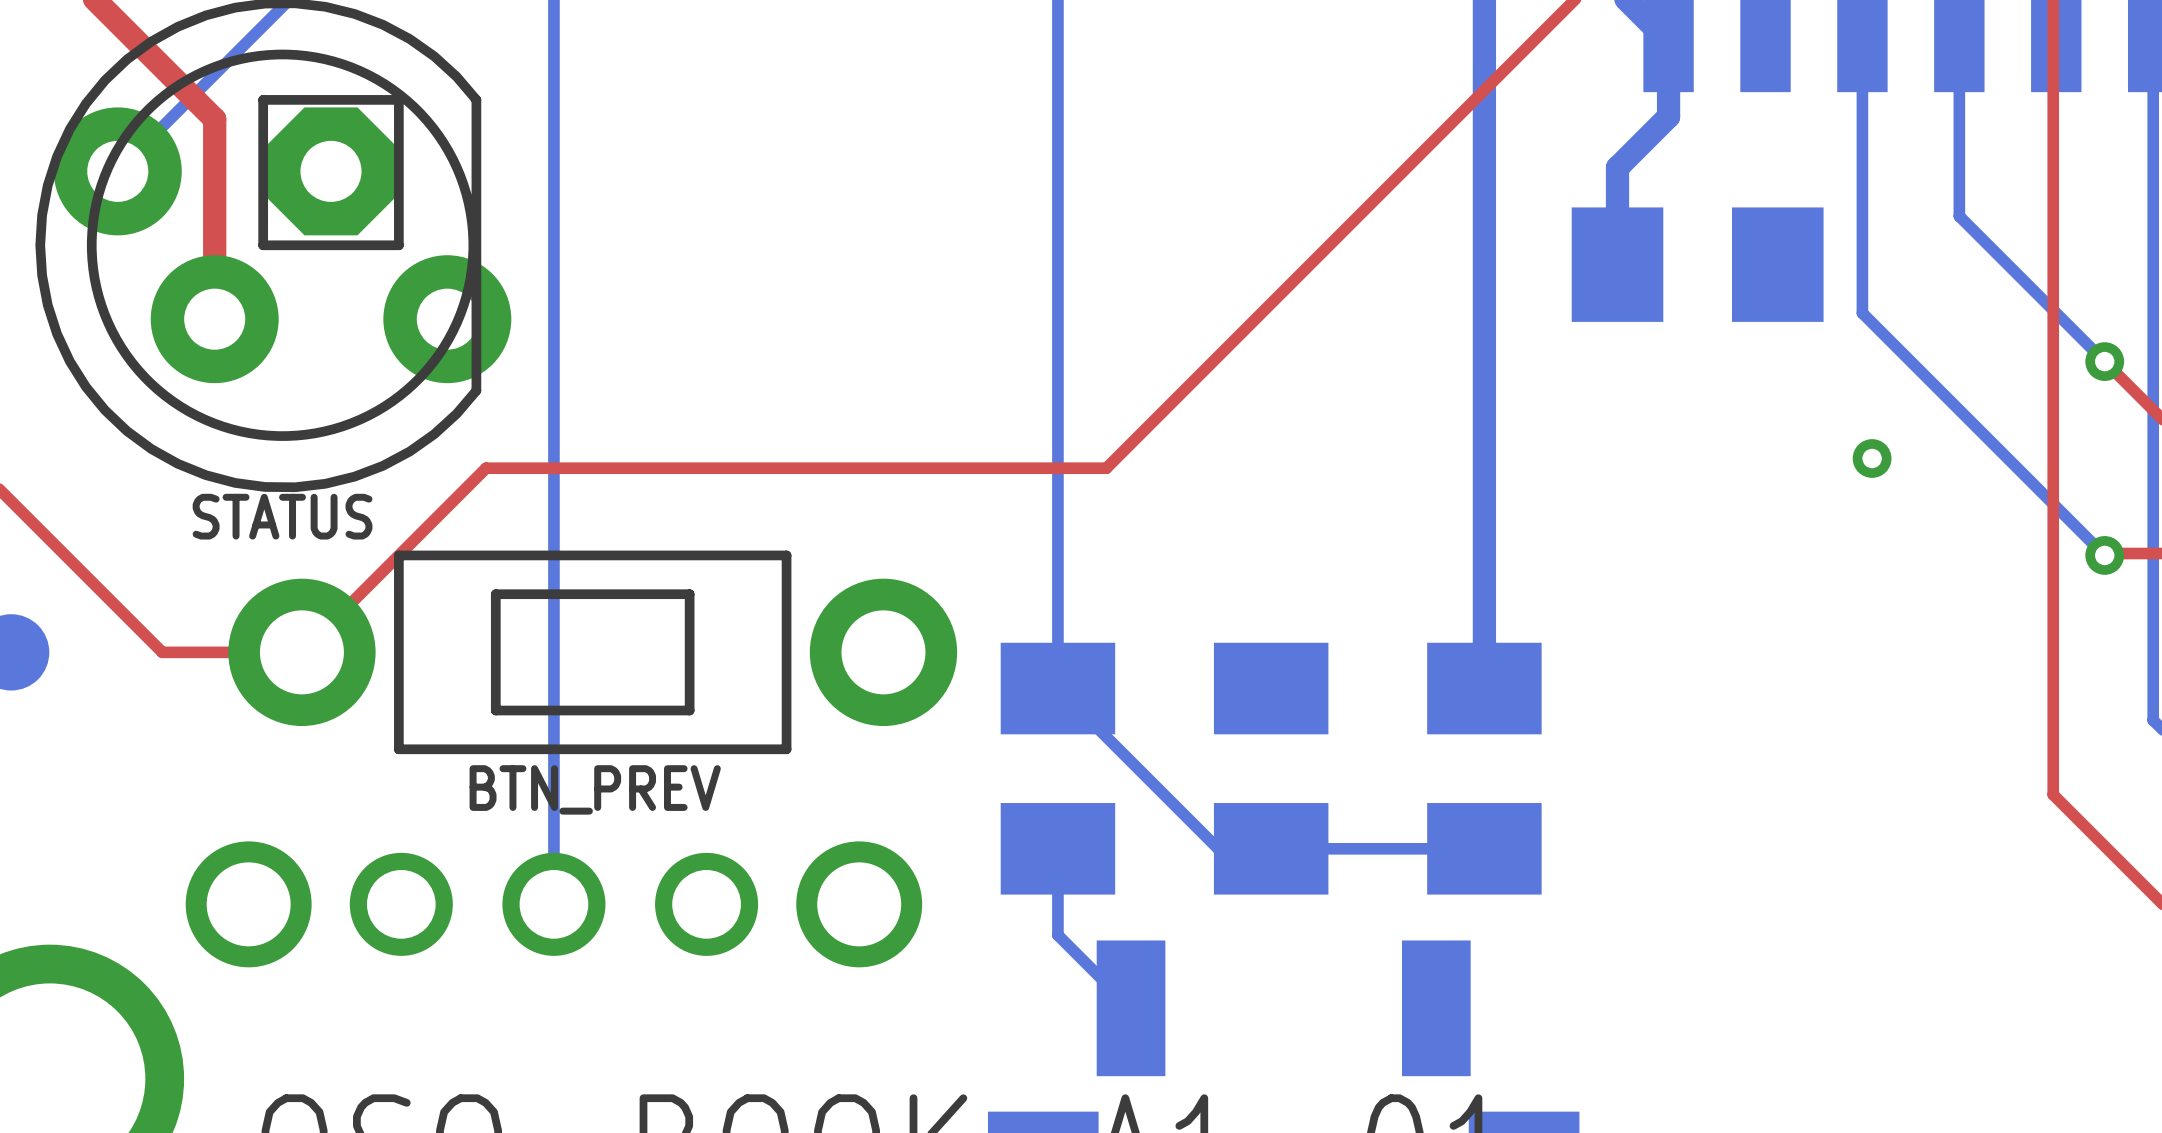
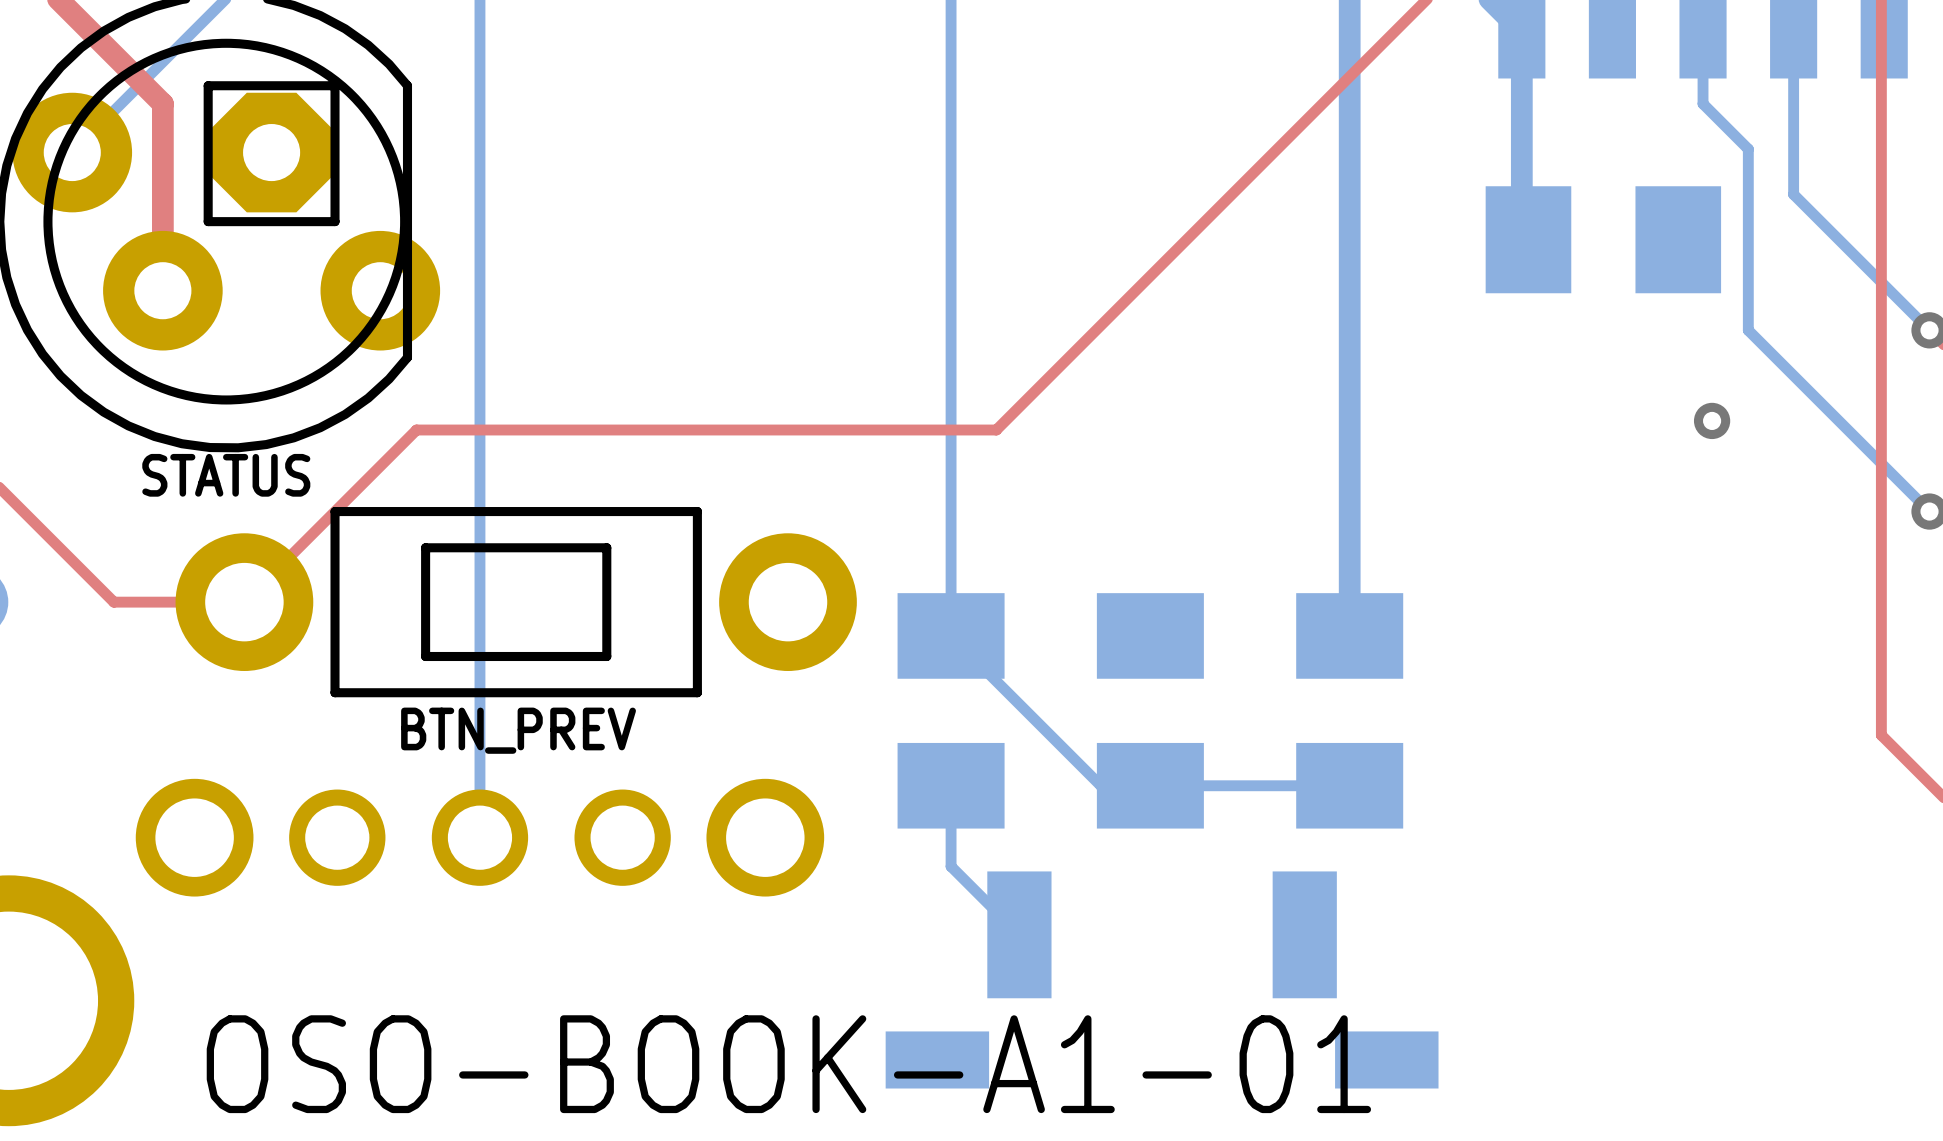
bottom track: (1668, 116) (1617, 167) (1617, 264) -> (1521, 101) (1521, 233) (1528, 239)
bottom track: (1862, 119) (1862, 313) (1910, 361) -> (1703, 103) (1748, 149) (1748, 330)
part position: (1697, 264) -> (1603, 239)

